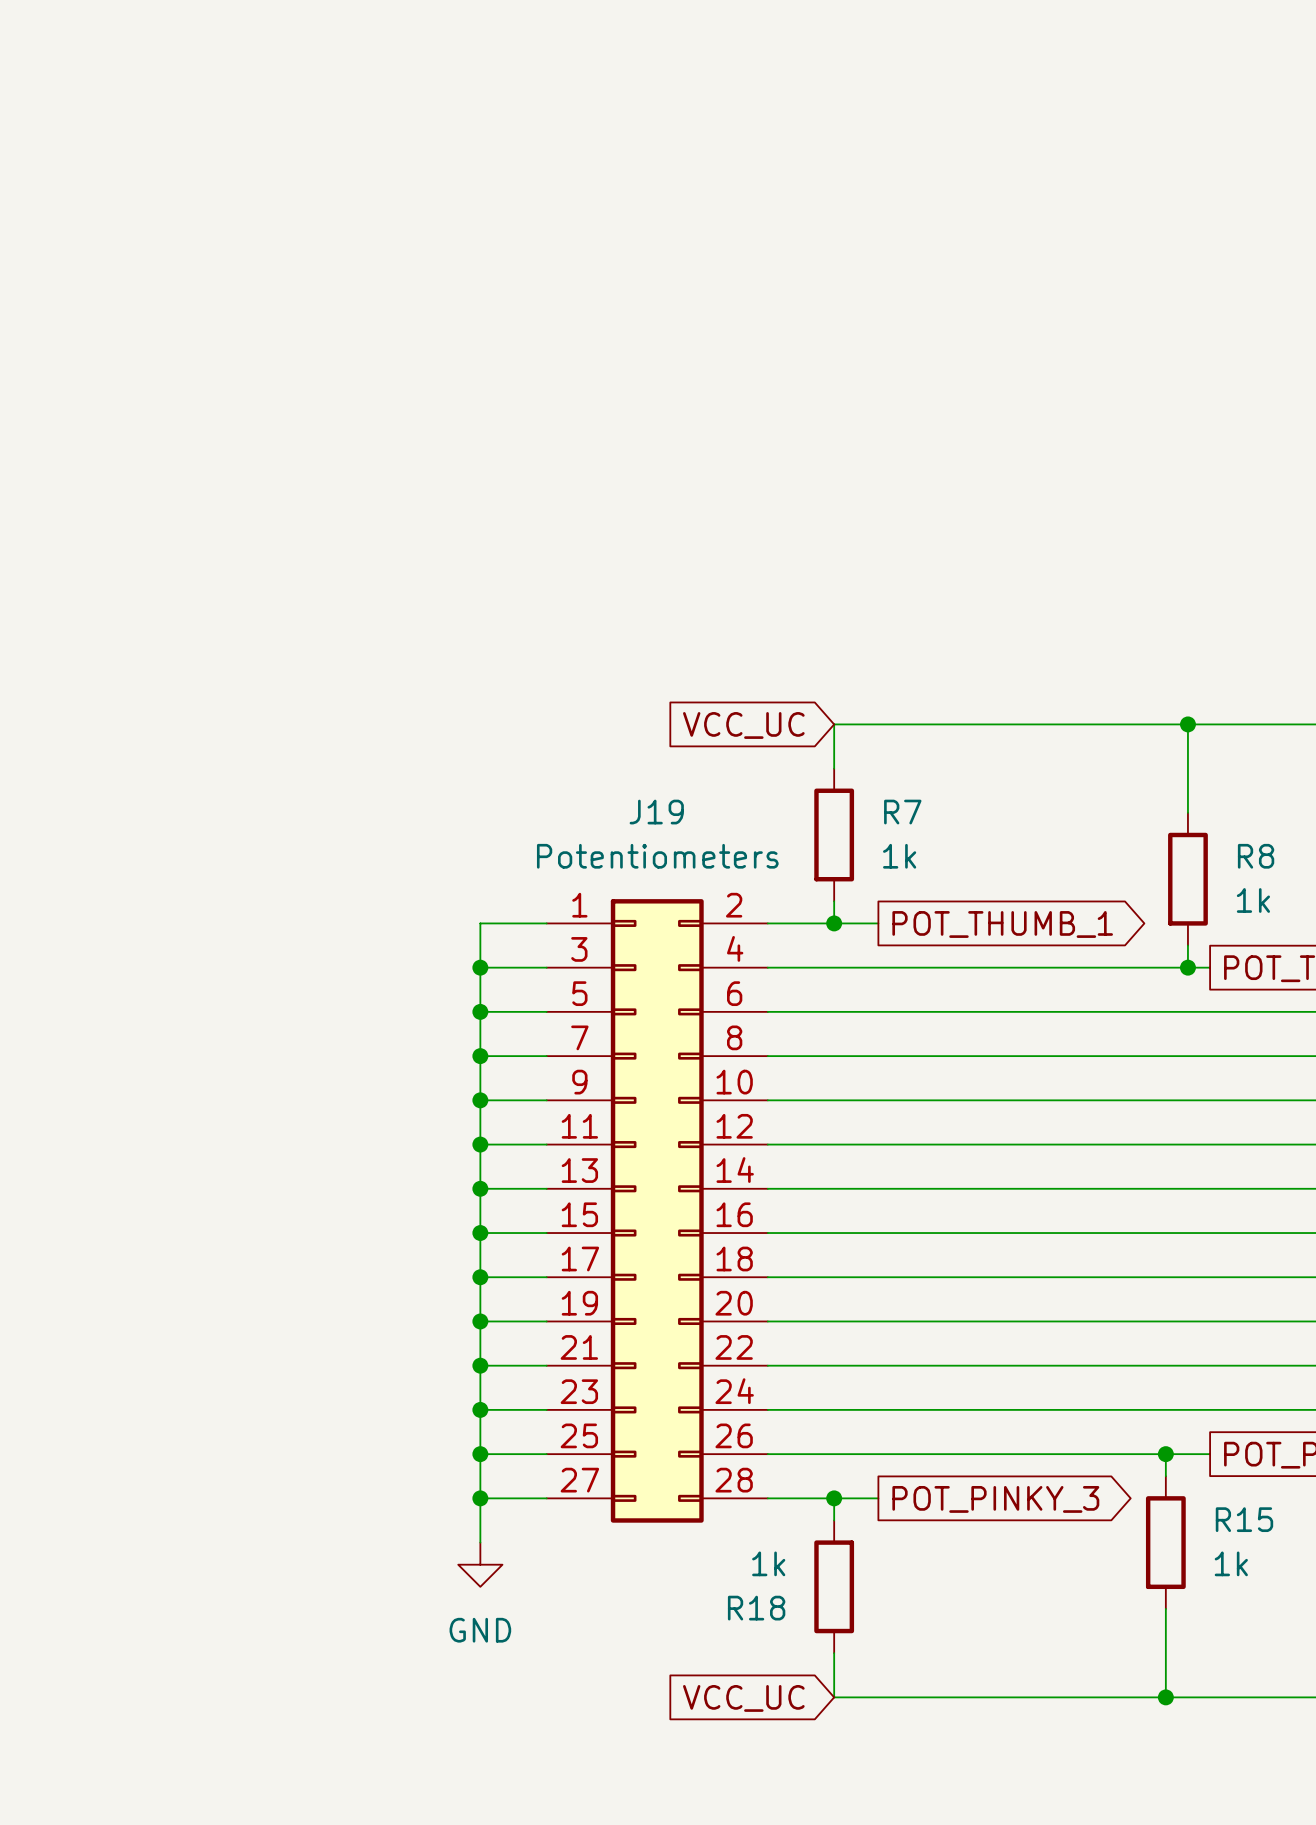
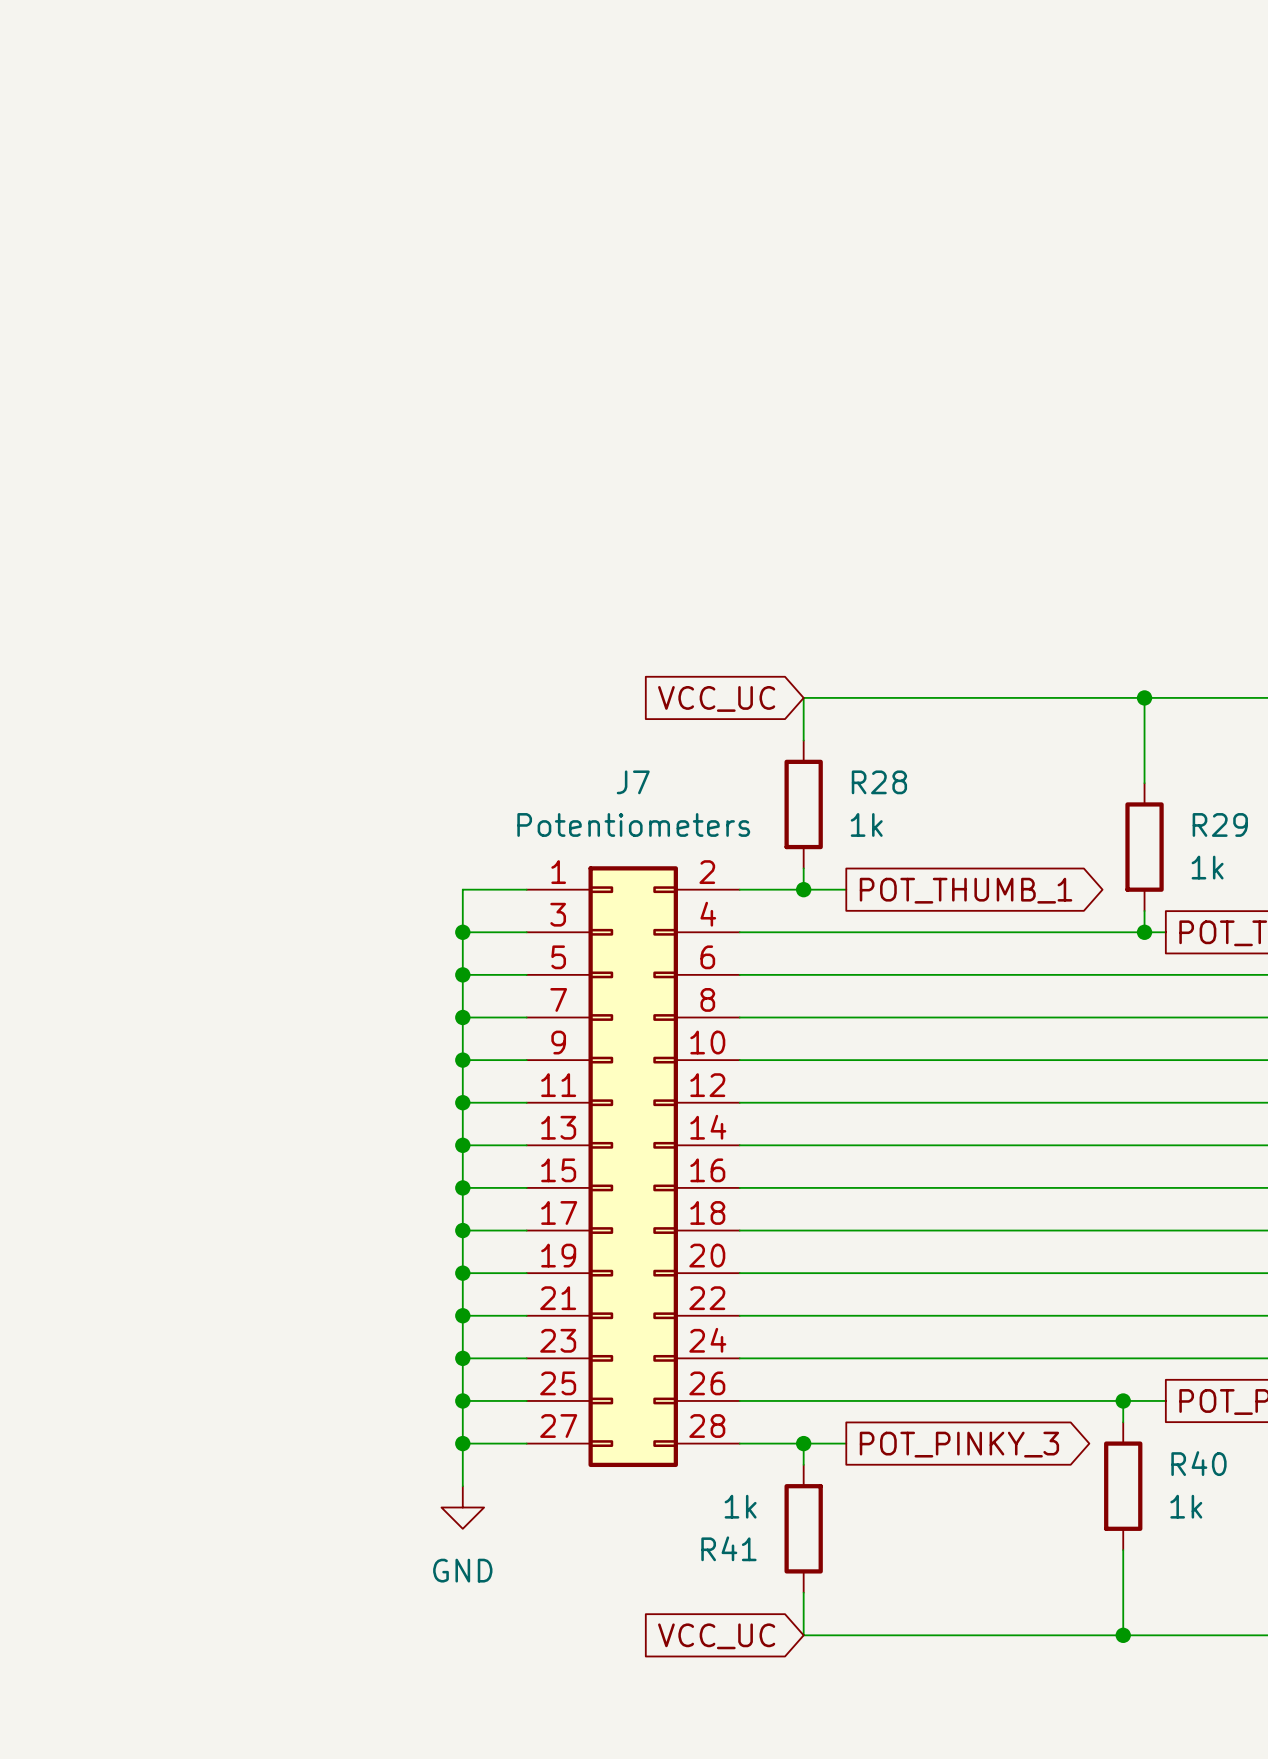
J19 name: J19 (656, 812) -> J7 (633, 782)
R7 name: R7 (902, 812) -> R28 (879, 782)
R8 name: R8 (1256, 856) -> R29 (1220, 824)
R15 name: R15 (1244, 1519) -> R40 (1198, 1463)
R18 name: R18 (756, 1608) -> R41 (728, 1548)

